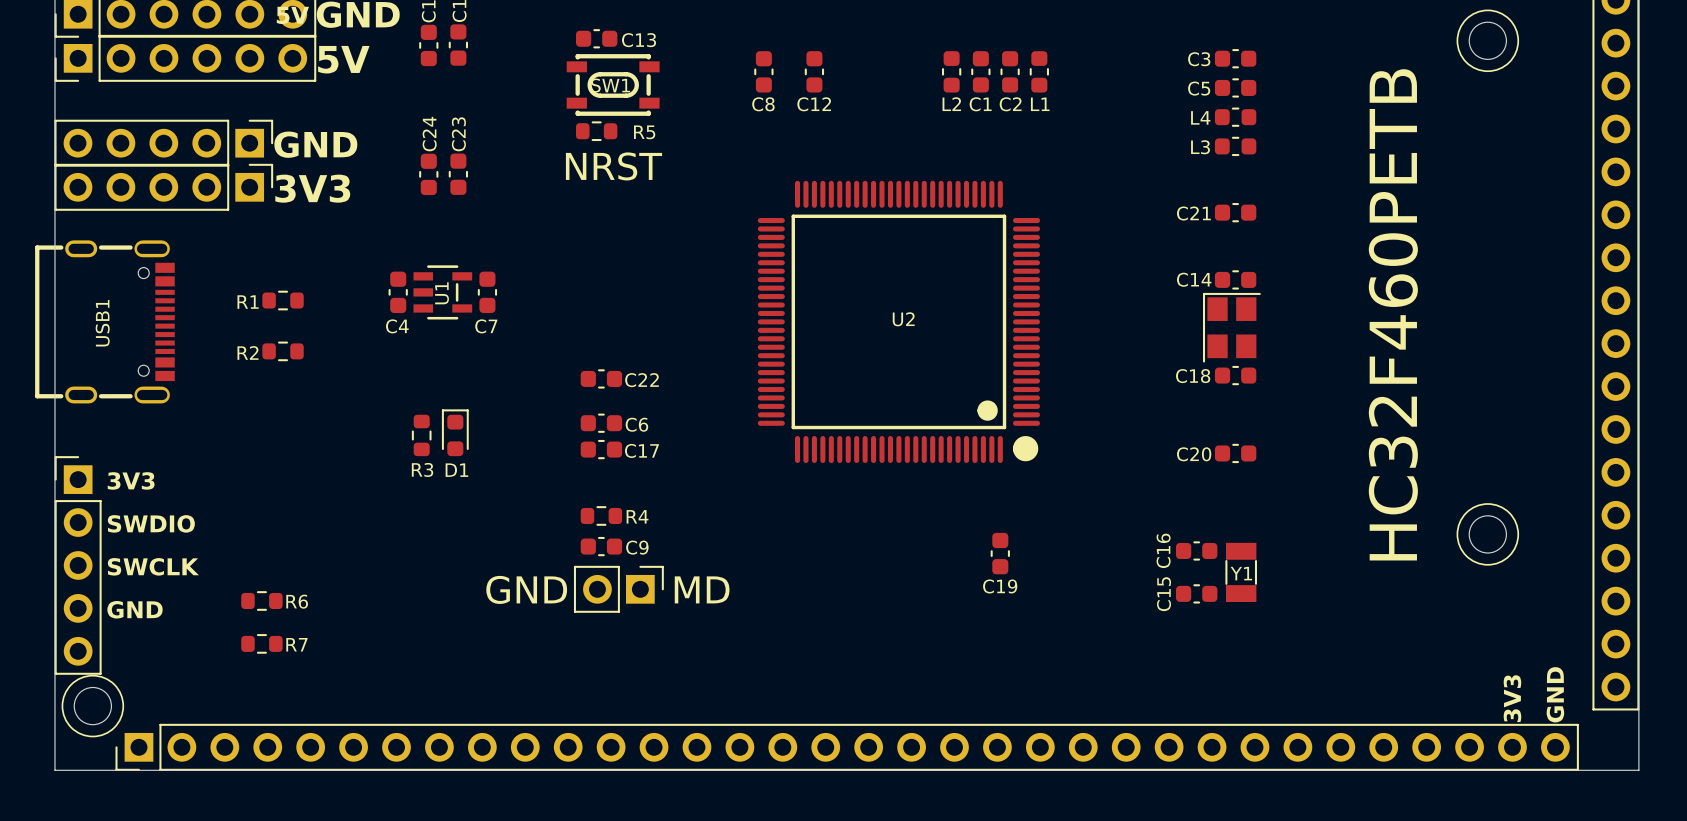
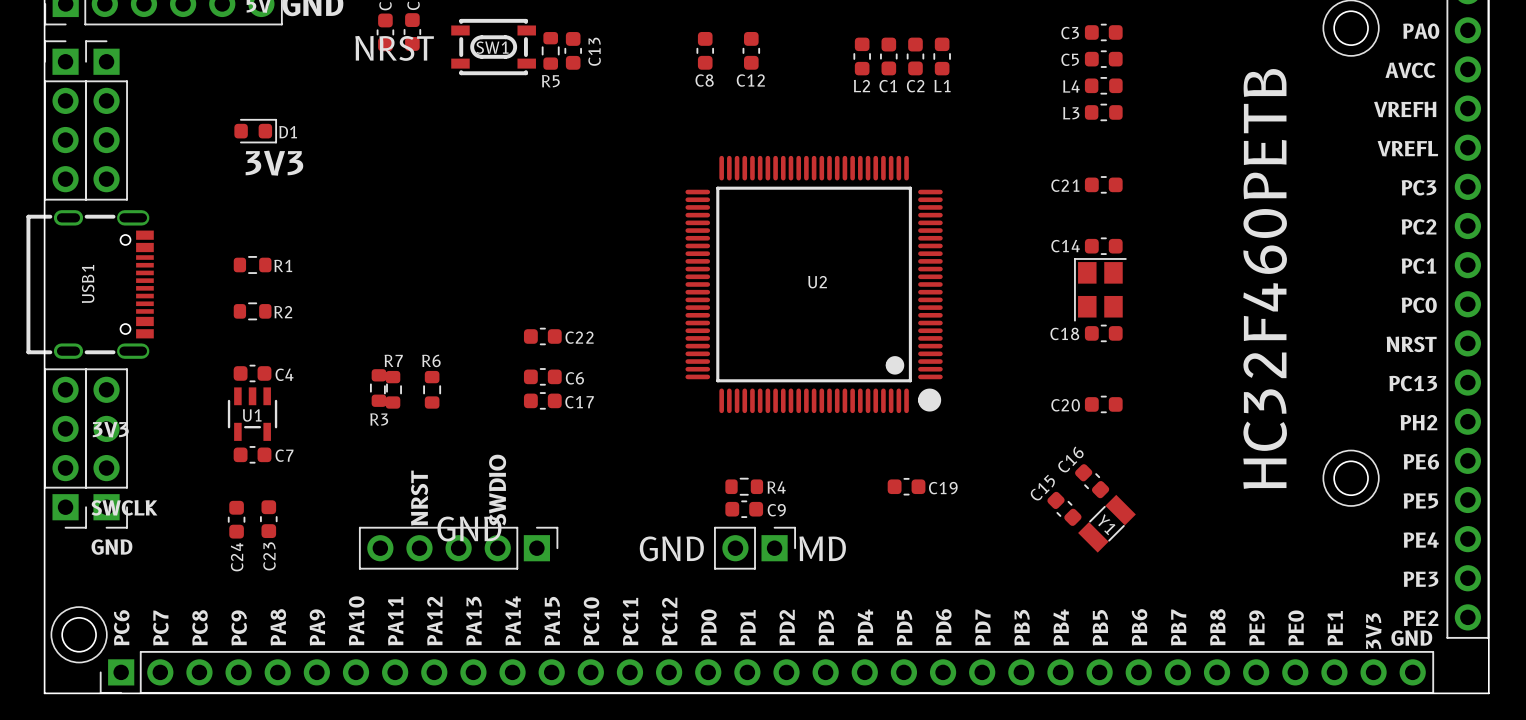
C13 rotation: 0° (596, 38) -> 90° clockwise (573, 50)
C13 position: (596, 38) -> (573, 50)
text: none -> PA0 (1421, 31)
part: (185, 58) -> none
C3 position: (1235, 58) -> (1103, 32)
text: 5V (343, 59) -> none
C8 position: (763, 71) -> (705, 50)
C12 position: (814, 71) -> (751, 50)
SW1 position: (613, 84) -> (493, 47)
text: none -> AVCC (1410, 70)
C5 position: (1235, 87) -> (1103, 59)
L4 position: (1235, 117) -> (1103, 85)
text: none -> VREFH (1405, 109)
R5 rotation: 0° (596, 131) -> 90° clockwise (550, 50)
R5 position: (596, 131) -> (550, 50)
C24 name position: C24 (429, 134) -> C24 (237, 557)
C23 name position: C23 (458, 134) -> C23 (269, 556)
part: none -> (65, 120)
part: none -> (106, 120)
part: (163, 143) -> none
text: GND (315, 144) -> none
L3 position: (1235, 146) -> (1103, 112)
text position: NRST (613, 166) -> NRST (394, 48)
text: none -> VREFL (1407, 148)
C24 position: (428, 174) -> (236, 519)
C23 position: (458, 174) -> (268, 519)
part: (163, 187) -> none
C21 position: (1235, 212) -> (1103, 184)
text: none -> PC3 (1419, 187)
text: none -> PC2 (1419, 226)
C14 position: (1235, 279) -> (1103, 246)
C4 rotation: 0° (398, 292) -> 90° clockwise (252, 373)
C4 position: (398, 292) -> (252, 373)
U1 rotation: 0° (442, 292) -> 90° clockwise (252, 414)
U1 position: (442, 292) -> (252, 414)
C7 rotation: 0° (487, 292) -> 90° clockwise (252, 454)
C7 position: (487, 292) -> (252, 454)
text: none -> PC1 (1418, 266)
R1 name position: R1 (248, 302) -> R1 (283, 265)
C4 name position: C4 (397, 326) -> C4 (284, 374)
C7 name position: C7 (486, 326) -> C7 (284, 455)
part position: (1231, 327) -> (1100, 289)
text: none -> PC0 (1419, 305)
R2 name position: R2 (247, 352) -> R2 (283, 312)
C18 position: (1235, 375) -> (1103, 333)
text: none -> NRST (1411, 344)
text: none -> PC13 (1413, 383)
D1 rotation: 0° (455, 432) -> 90° clockwise (255, 131)
D1 position: (455, 432) -> (255, 131)
C20 position: (1235, 453) -> (1103, 404)
D1 name position: D1 (456, 470) -> D1 (288, 132)
text: none -> PH2 (1418, 422)
part: none -> (65, 448)
part: none -> (106, 448)
R4 position: (601, 515) -> (744, 486)
text: none -> PE6 (1421, 461)
text: SWDIO (151, 523) -> none
text: none -> SWDIO (497, 490)
C9 position: (601, 546) -> (744, 509)
text: none -> NRST (419, 498)
C16 rotation: 0° (1196, 550) -> 45° clockwise (1092, 481)
C19 rotation: 0° (1000, 553) -> 90° clockwise (906, 486)
text: none -> PE5 (1420, 500)
part: (78, 565) -> none
Y1 rotation: 0° (1241, 572) -> 45° clockwise (1106, 523)
C19 name position: C19 (1000, 586) -> C19 (943, 488)
part position: (618, 589) -> (755, 548)
text position: MD (702, 589) -> MD (822, 548)
C15 rotation: 0° (1196, 593) -> 45° clockwise (1064, 508)
C15 position: (1196, 593) -> (1064, 508)
R6 rotation: 0° (261, 600) -> 90° clockwise (432, 389)
R6 position: (261, 600) -> (432, 389)
R6 name position: R6 (297, 601) -> R6 (431, 360)
text: none -> PE4 (1421, 539)
part: none -> (458, 548)
text: none -> GND (671, 548)
R7 rotation: 0° (261, 643) -> 90° clockwise (392, 389)
R7 position: (261, 643) -> (392, 389)
R7 name position: R7 (296, 644) -> R7 (393, 360)
text: none -> PE3 (1421, 579)
text: none -> PA10 (356, 620)
text: none -> PA11 (395, 621)
text: none -> PA14 (513, 620)
text: none -> PA15 (552, 621)
text: none -> PA12 (434, 621)
text: none -> PA13 (473, 621)
text: none -> PC10 (591, 621)
text: none -> PC11 (630, 621)
text: none -> PC12 (669, 621)
text: none -> PE2 (1421, 618)
text: none -> PA8 (278, 627)
text: none -> PA9 (317, 627)
text: none -> PD0 (708, 627)
text: none -> PD1 (747, 627)
text: none -> PD2 (787, 627)
text: none -> PD3 (826, 627)
text: none -> PD4 (865, 627)
text: none -> PD5 (904, 627)
text: none -> PD6 (943, 627)
text: none -> PD7 (982, 627)
text: none -> PB4 (1061, 627)
text: none -> PB6 (1139, 627)
text: none -> PC6 (121, 627)
text: none -> PC7 (160, 628)
text: none -> PC8 (200, 627)
text: none -> PC9 (239, 627)
text: none -> PB3 (1022, 627)
text: none -> PB5 (1100, 627)
text: none -> PB7 (1178, 627)
text: none -> PB8 (1217, 627)
text: none -> PE9 (1256, 627)
text: none -> PE0 (1296, 627)
text: none -> PE1 (1335, 628)
text rotation: 0° (1555, 694) -> 90° clockwise (1411, 638)

